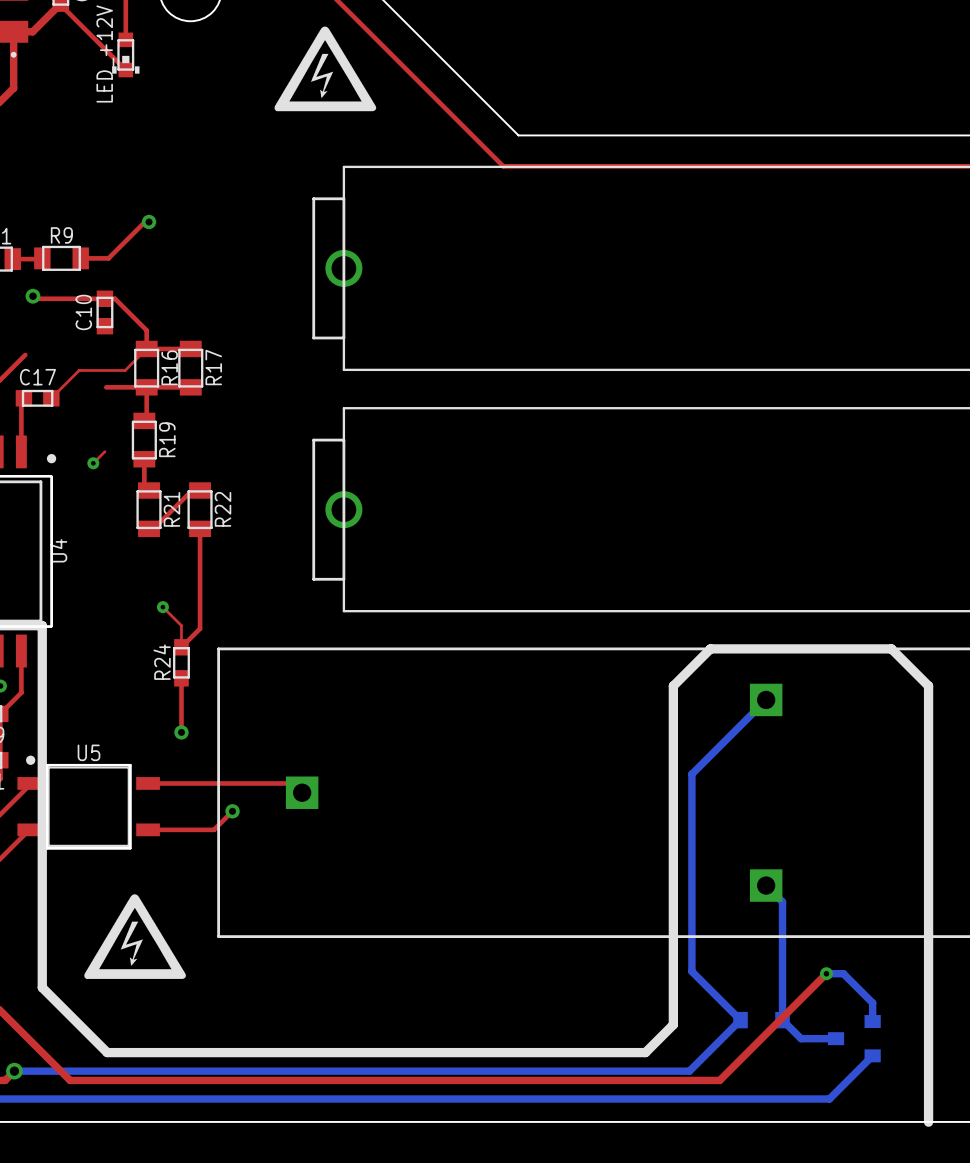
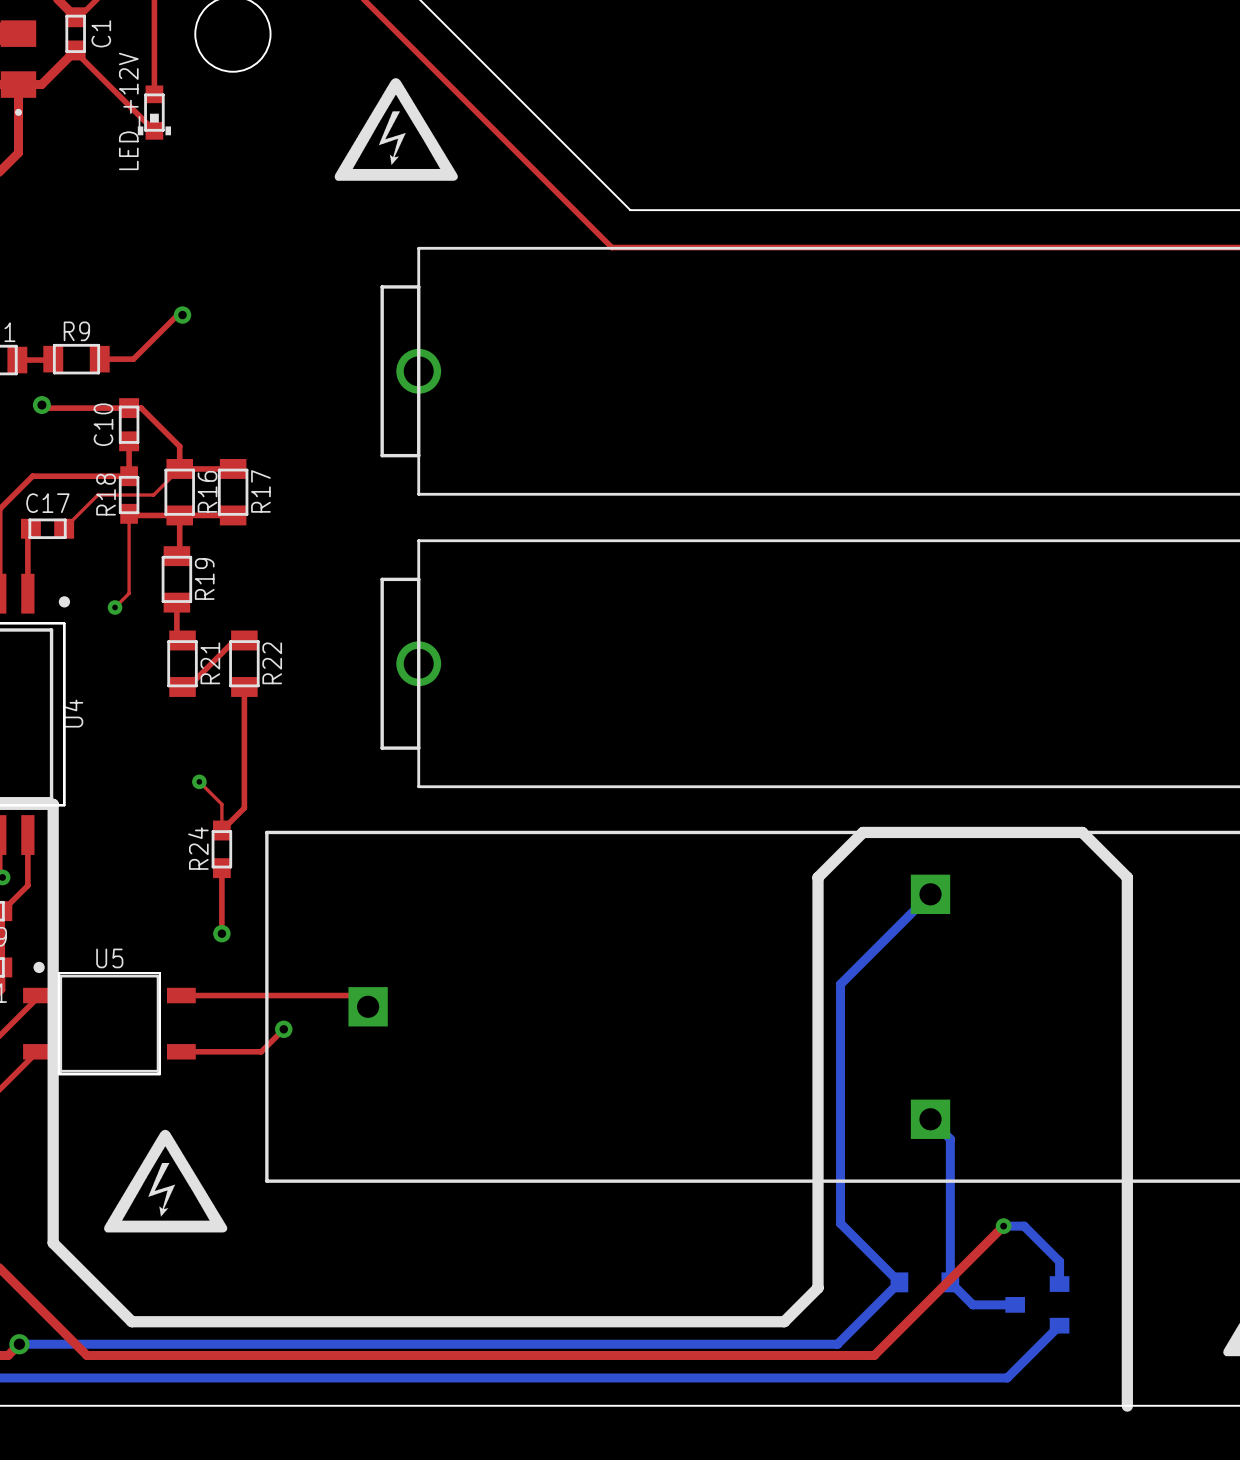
top track: none -> (129, 441) (129, 476) (32, 476)
R18: none -> (129, 495)
top track: none -> (130, 515) (129, 513) (129, 593)

